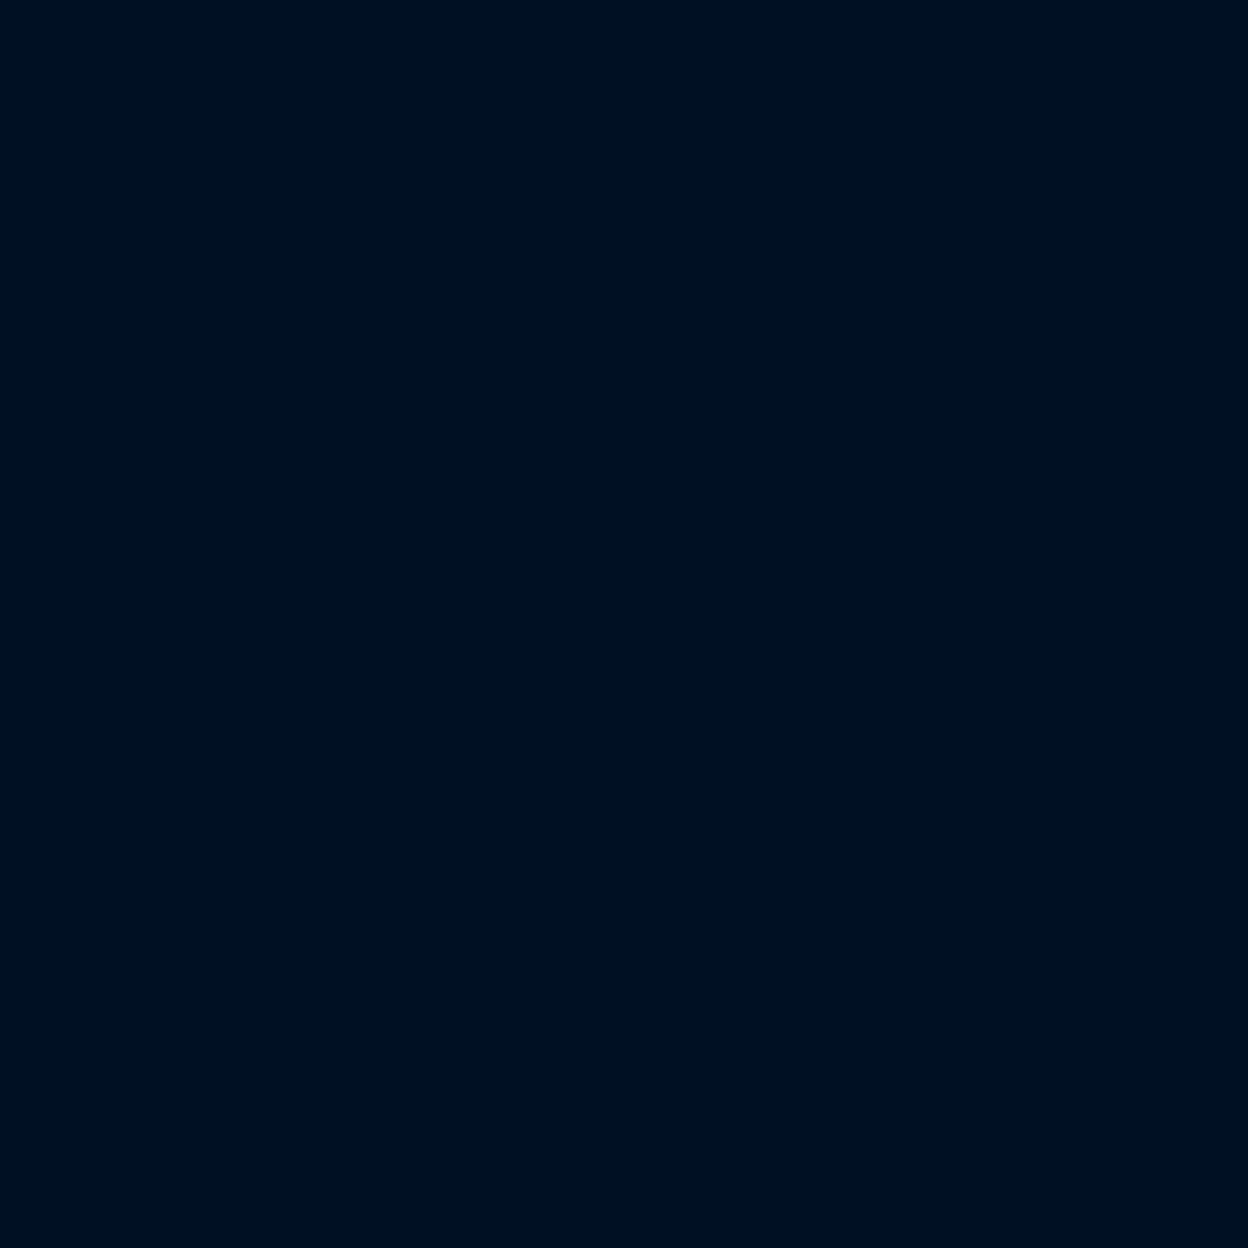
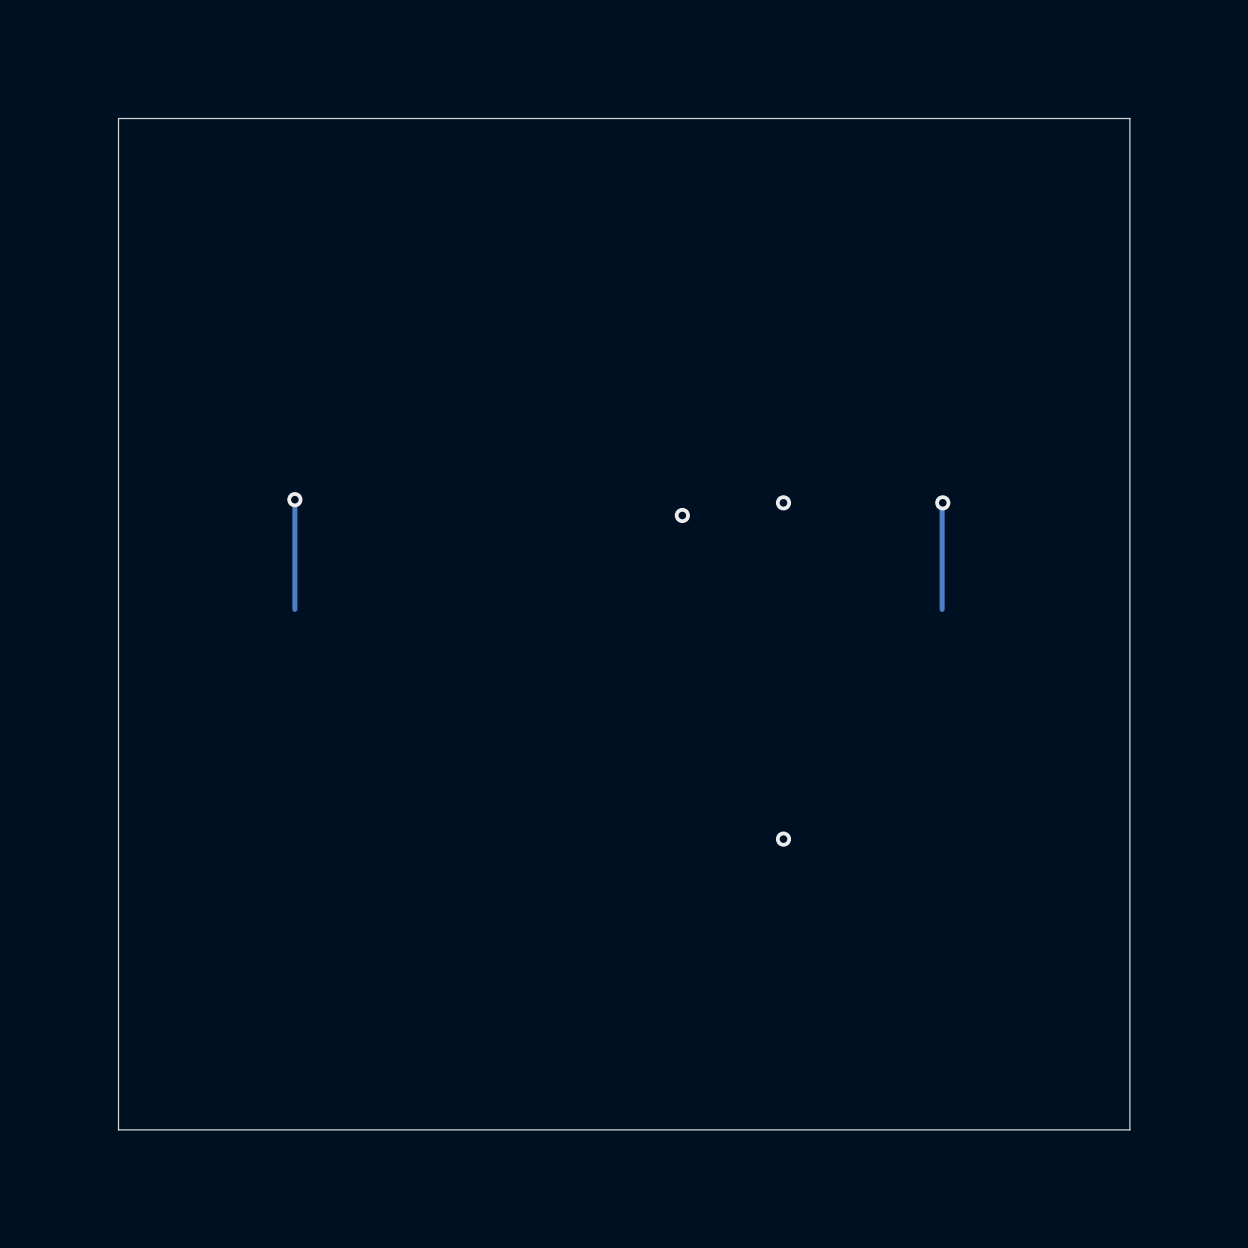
board edge: none -> (1129, 118) (1129, 1129) (118, 1129) (118, 118) (1129, 118)
track: none -> (292, 497) (294, 499) (294, 609)
via: none -> (294, 499)
via: none -> (783, 502)
track: none -> (942, 502) (942, 609)
via: none -> (942, 502)
via: none -> (682, 515)
via: none -> (783, 839)

